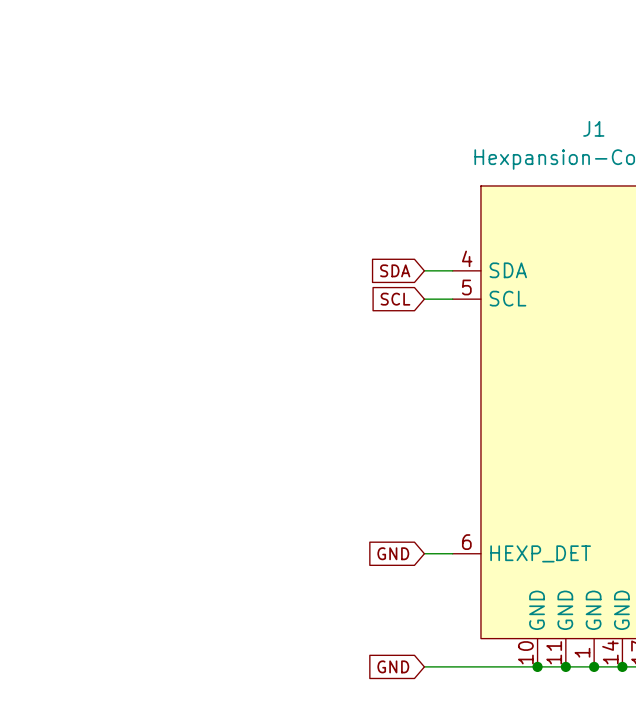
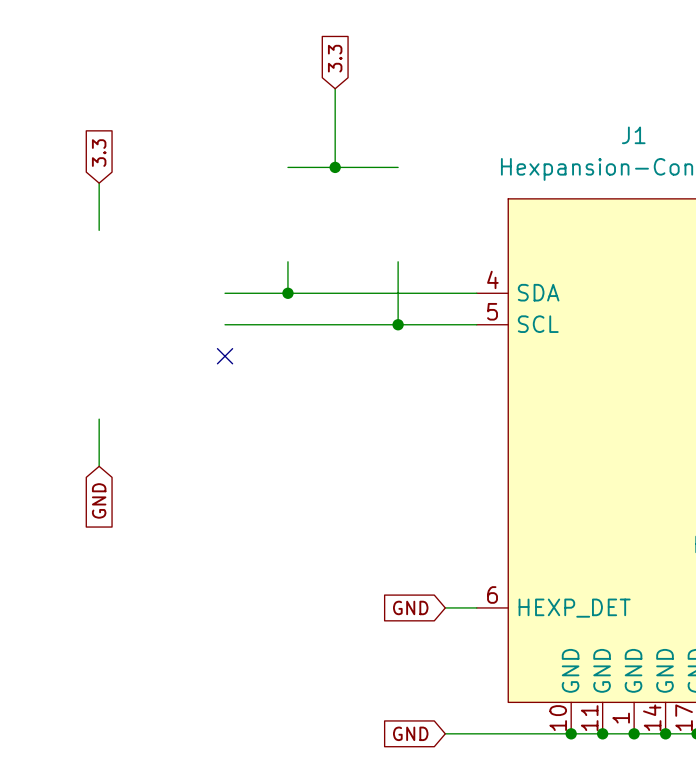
global label: none -> 3.3 (335, 58)
wire: none -> (335, 88) (335, 167)
global label: none -> 3.3 (99, 153)
wire: none -> (287, 167) (398, 167)
junction: none -> (335, 167)
wire: none -> (99, 183) (99, 230)
wire: none -> (287, 261) (287, 293)
wire: none -> (398, 261) (398, 324)
wire: none -> (225, 293) (445, 293)
junction: none -> (287, 293)
global label: SDA (395, 270) -> none
wire: none -> (225, 324) (445, 324)
junction: none -> (398, 324)
global label: SCL (395, 299) -> none
no-connect mark: none -> (225, 356)
wire: none -> (99, 419) (99, 466)
global label: none -> GND (99, 500)

